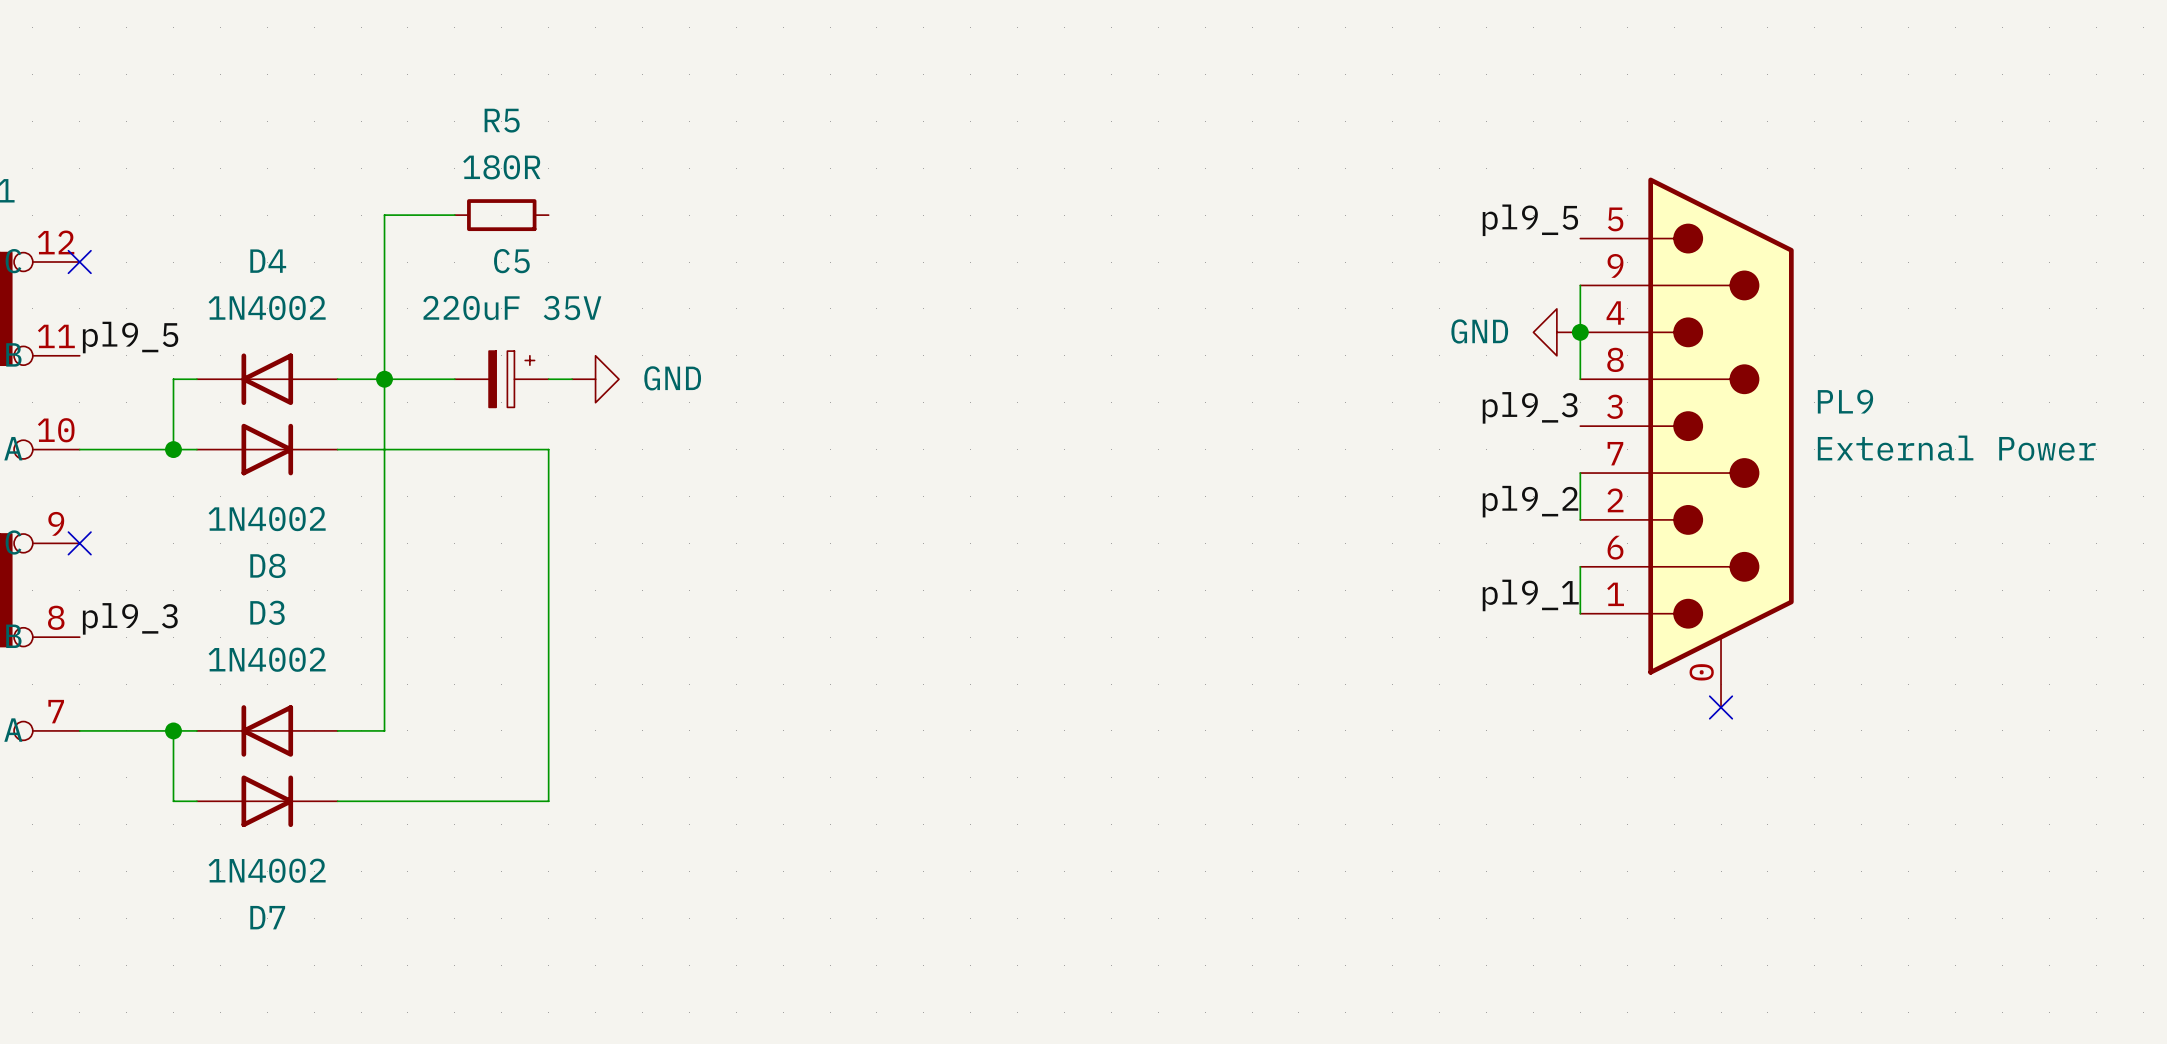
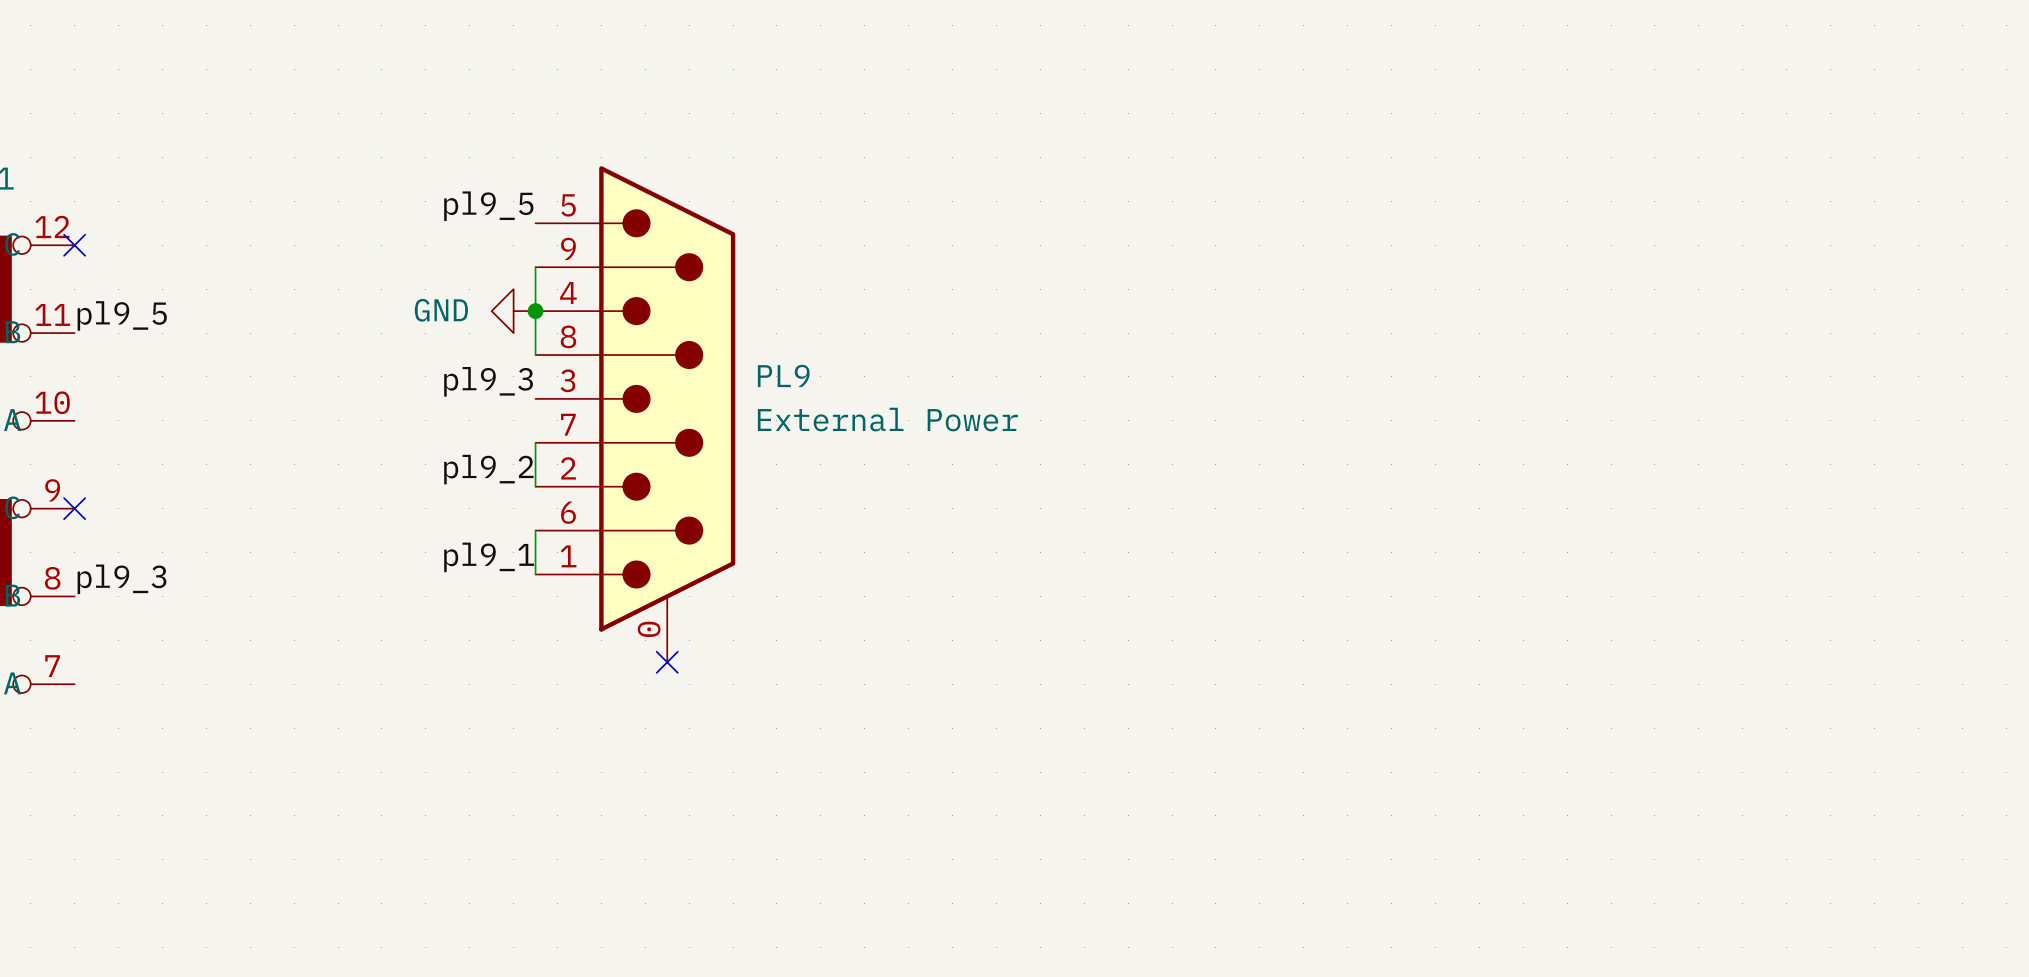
wire: (454, 215) (384, 215) (384, 730) (337, 730) -> none
R5: 180R (501, 215) -> none
label: none -> pl9_5 (488, 206)
label: pl9_5 (1530, 220) -> none
wire: (1580, 285) (1580, 379) -> none
junction: none -> (535, 311)
power symbol: GND (1556, 332) -> none
junction: (1580, 332) -> none
wire: (196, 379) (173, 379) (173, 449) -> none
D4: 1N4002 (267, 379) -> none
wire: (337, 379) (454, 379) -> none
junction: (384, 379) -> none
C5: 220uF 35V (501, 379) -> none
wire: (548, 379) (572, 379) -> (535, 267) (535, 355)
power symbol rotation: 0° (595, 379) -> 180° (513, 311)
power symbol position: GND (595, 379) -> GND (513, 311)
label: none -> pl9_3 (488, 381)
label: pl9_3 (1530, 407) -> none
PL9 position: (1687, 442) -> (635, 414)
wire: (79, 449) (196, 449) -> none
junction: (173, 449) -> none
D8: 1N4002 (267, 449) -> none
wire: (337, 449) (548, 449) (548, 801) (337, 801) -> none
wire: none -> (535, 442) (535, 486)
wire: (1580, 473) (1580, 519) -> none
label: none -> pl9_2 (488, 469)
label: pl9_2 (1530, 501) -> none
wire: none -> (535, 530) (535, 574)
wire: (1580, 566) (1580, 613) -> none
label: none -> pl9_1 (489, 557)
label: pl9_1 (1530, 595) -> none
no-connect mark: none -> (667, 662)
no-connect mark: (1721, 707) -> none
wire: (79, 730) (196, 730) -> none
wire: (173, 730) (173, 801) (196, 801) -> none
junction: (173, 730) -> none
D3: 1N4002 (267, 730) -> none
D7: 1N4002 (267, 801) -> none

